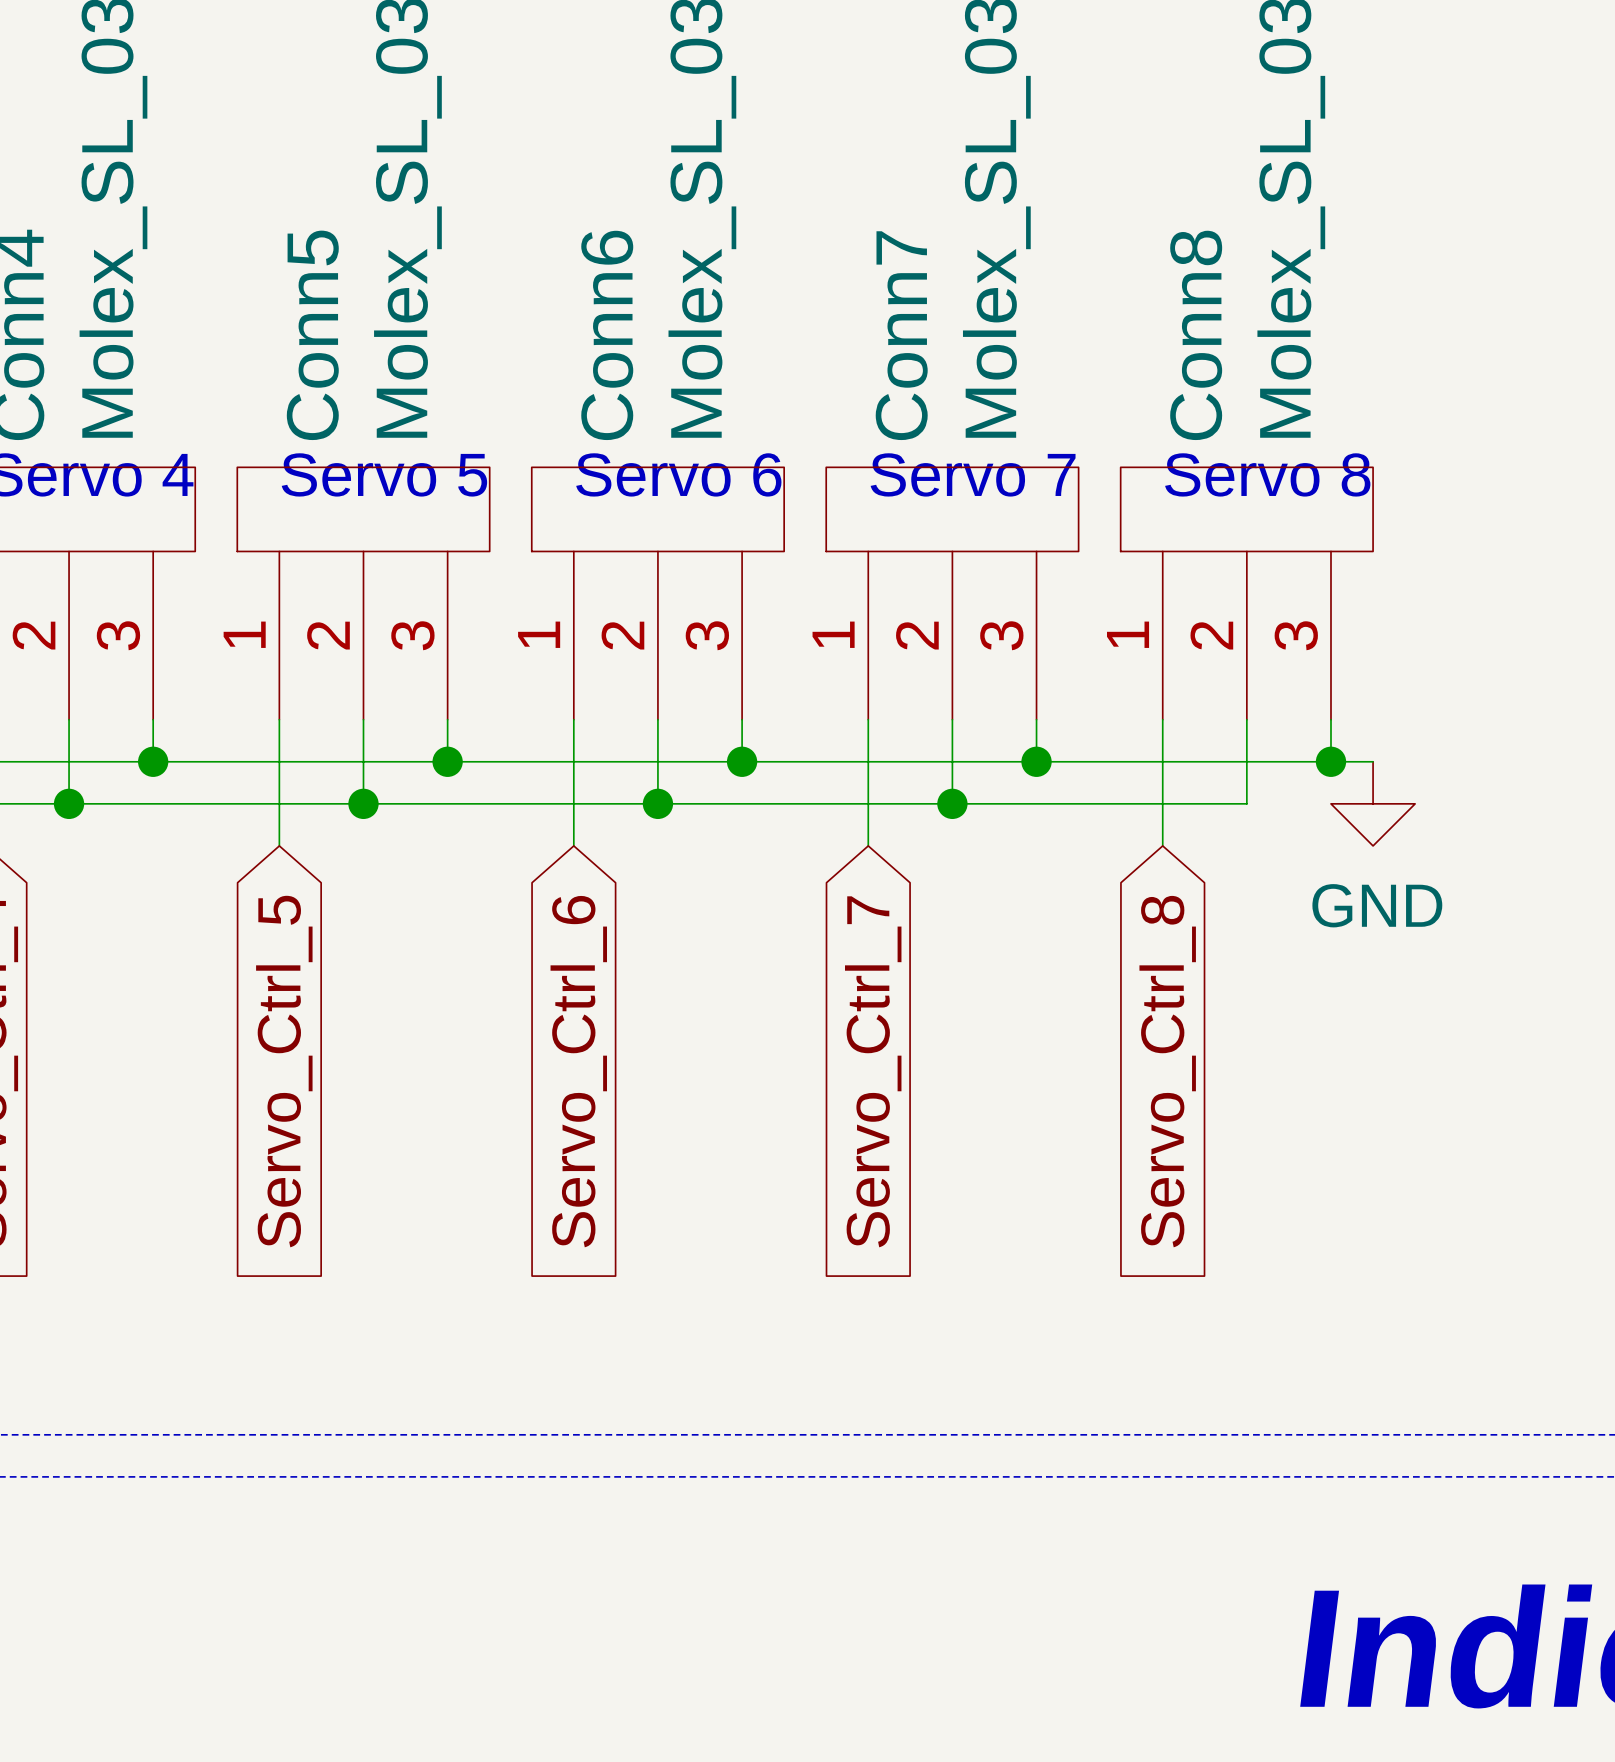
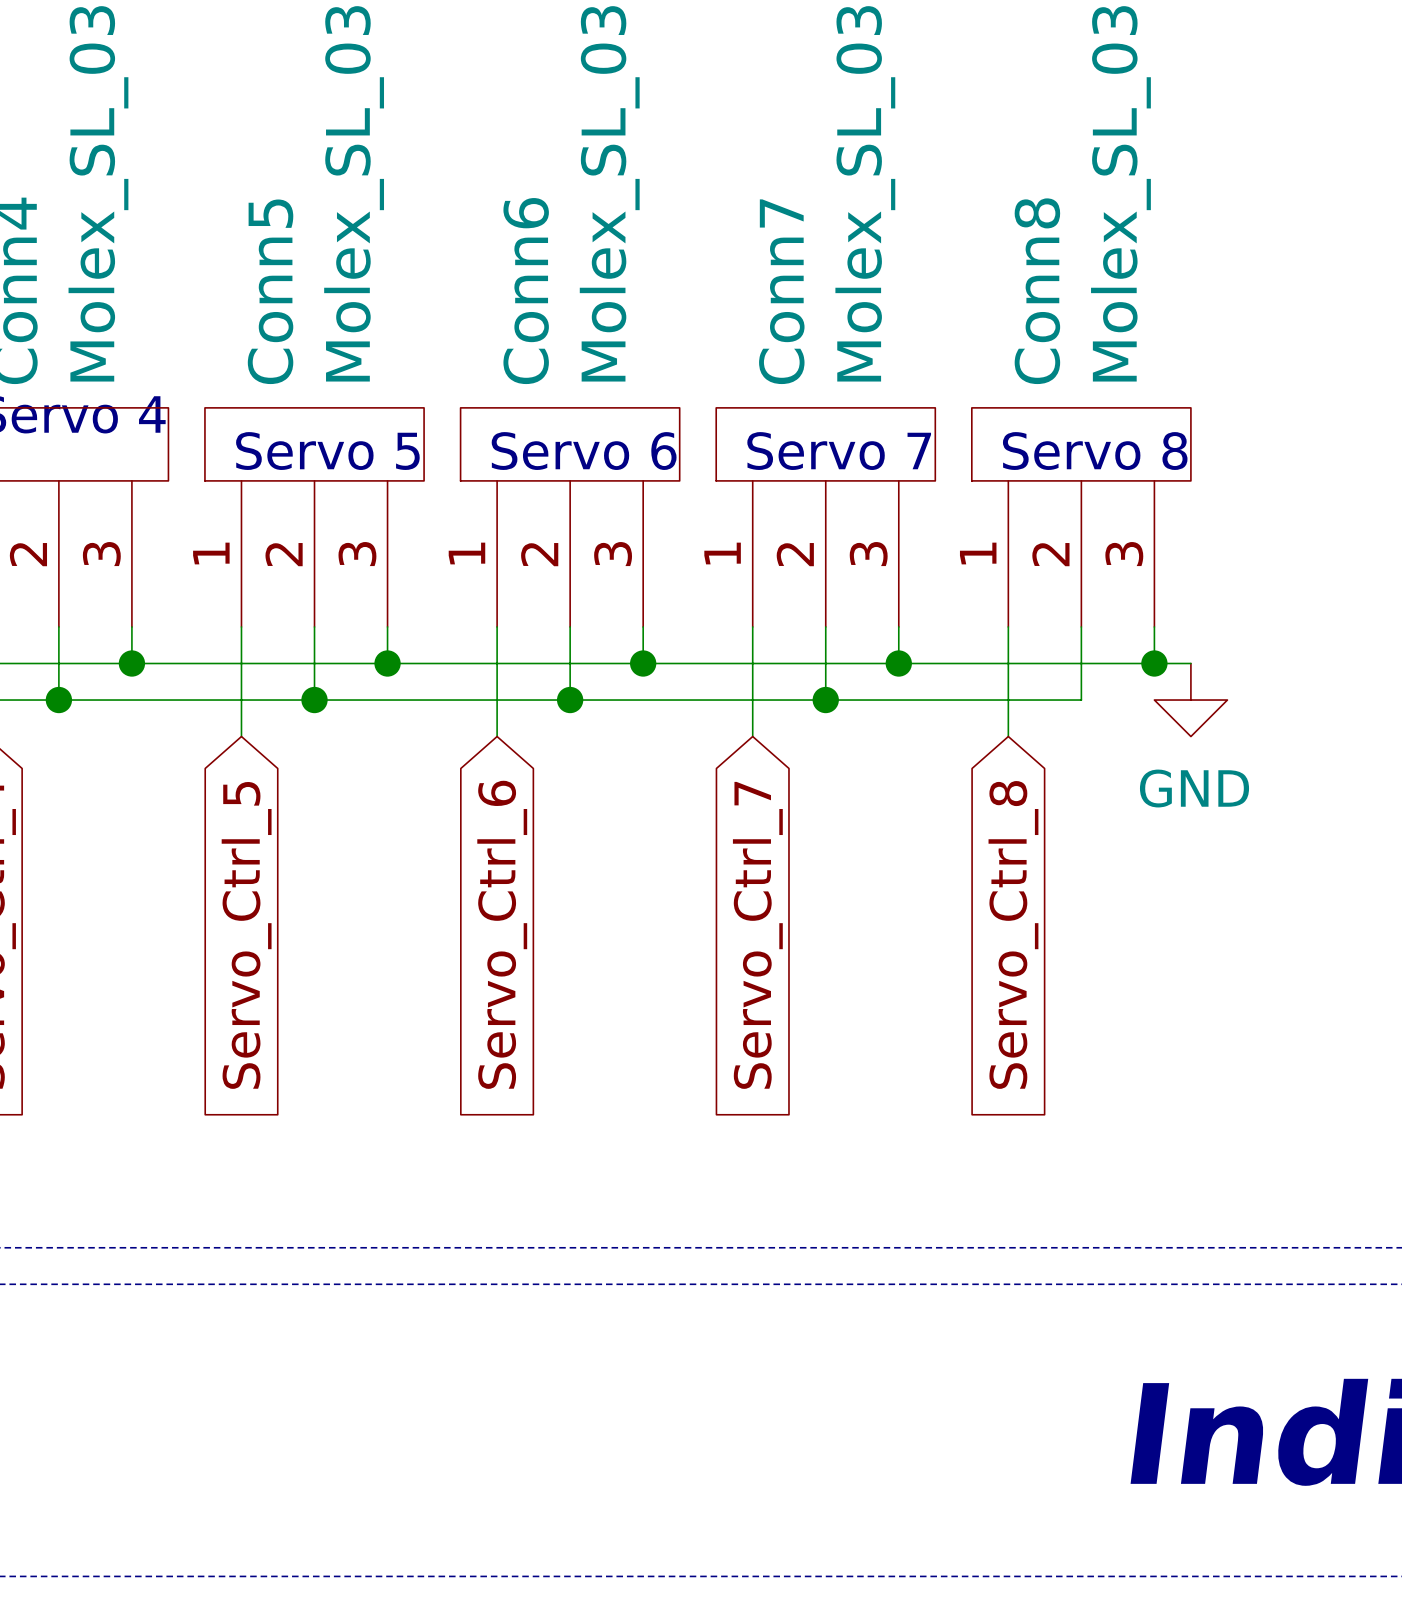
text position: Servo 5 (384, 474) -> Servo 5 (327, 451)
text position: Servo 6 (678, 474) -> Servo 6 (584, 451)
text position: Servo 7 (973, 474) -> Servo 7 (839, 451)
text position: Servo 8 (1267, 474) -> Servo 8 (1095, 451)

